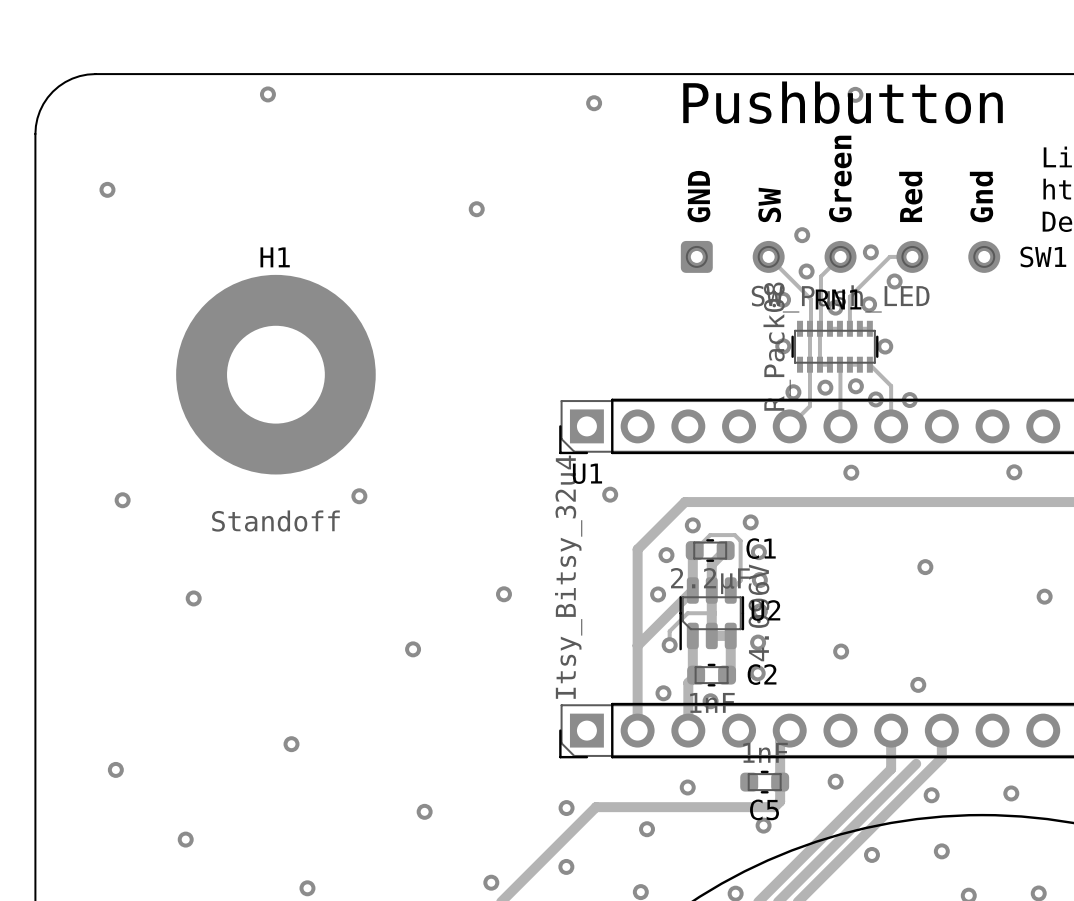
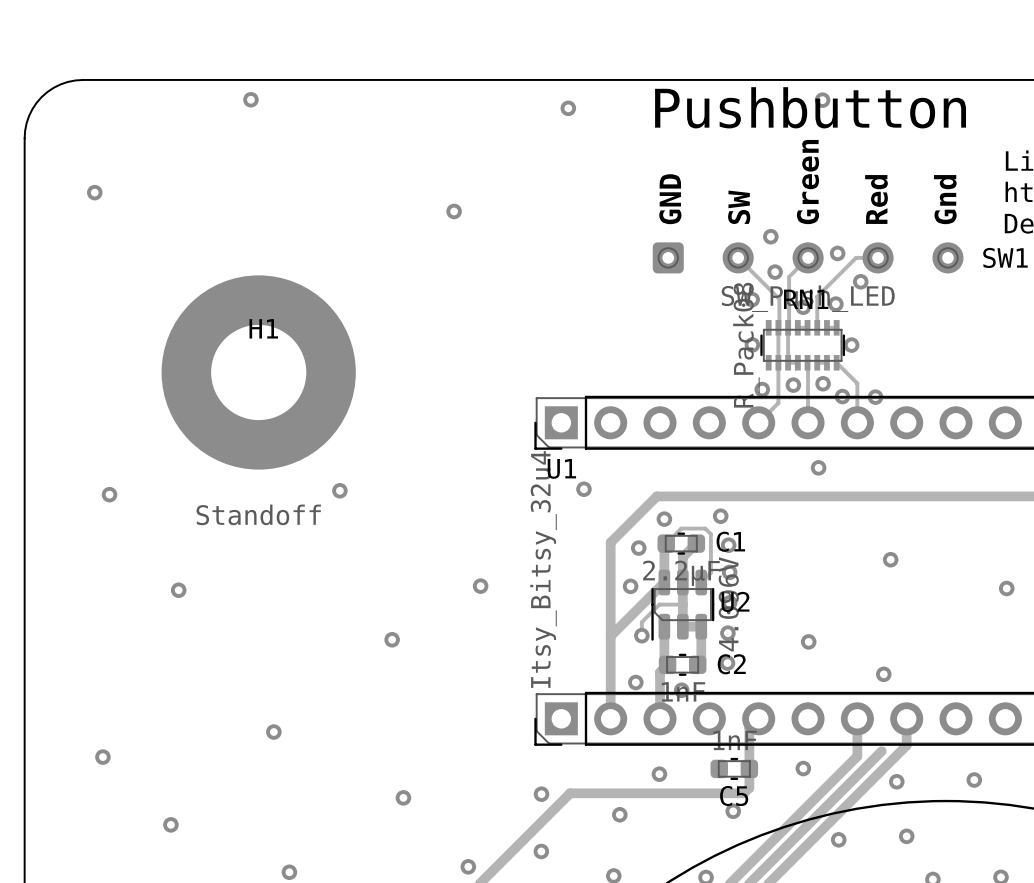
H1 name position: H1 (275, 257) -> H1 (263, 328)
via: (1014, 472) -> none

